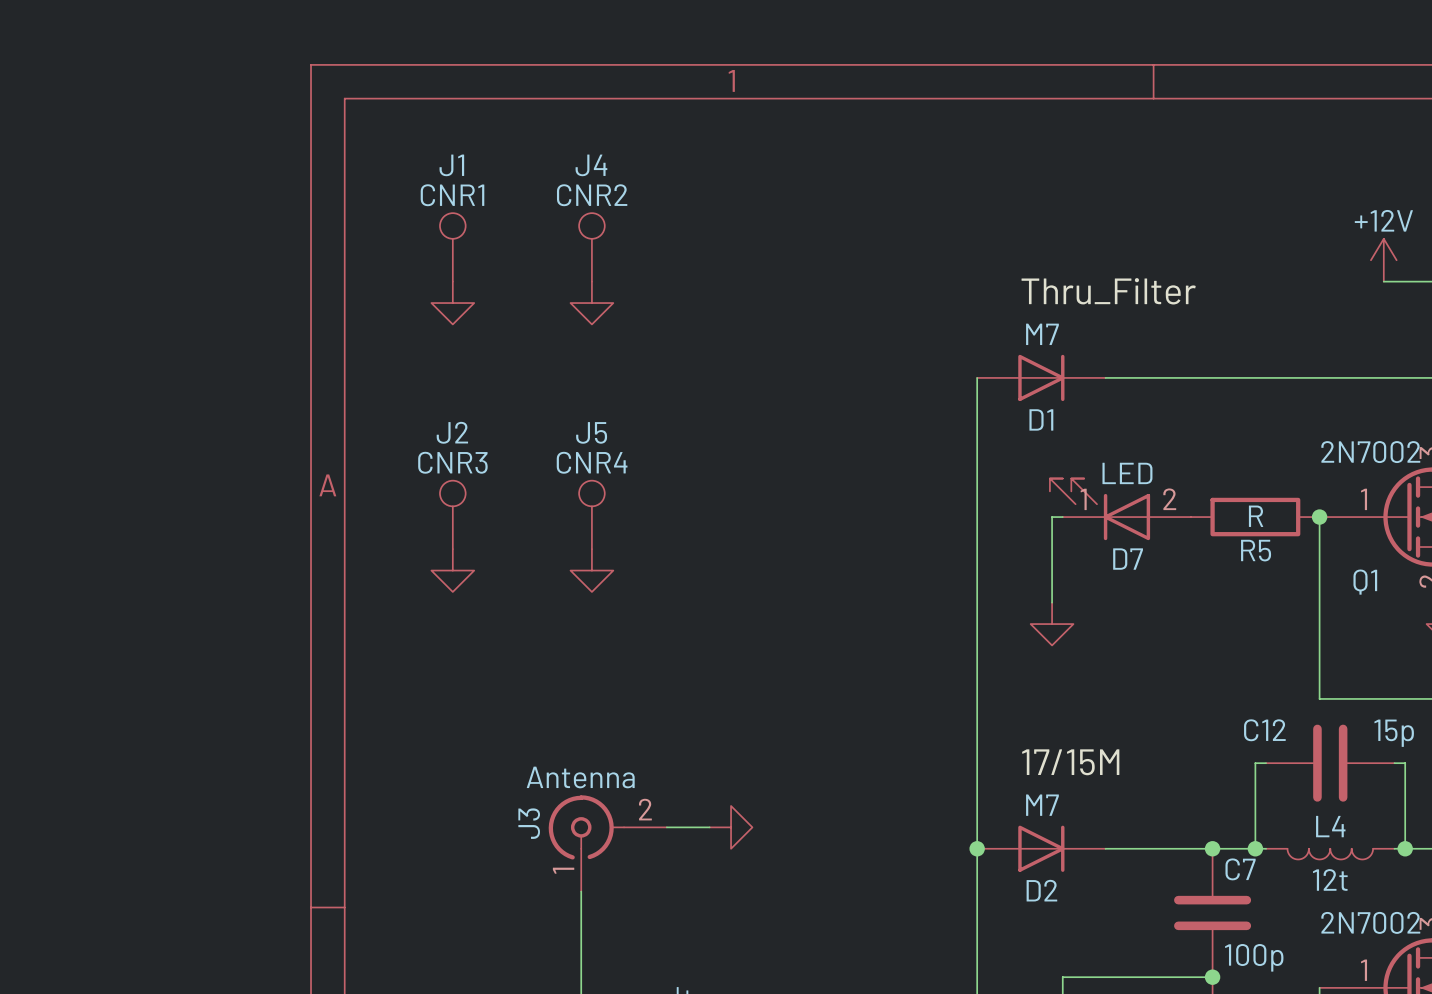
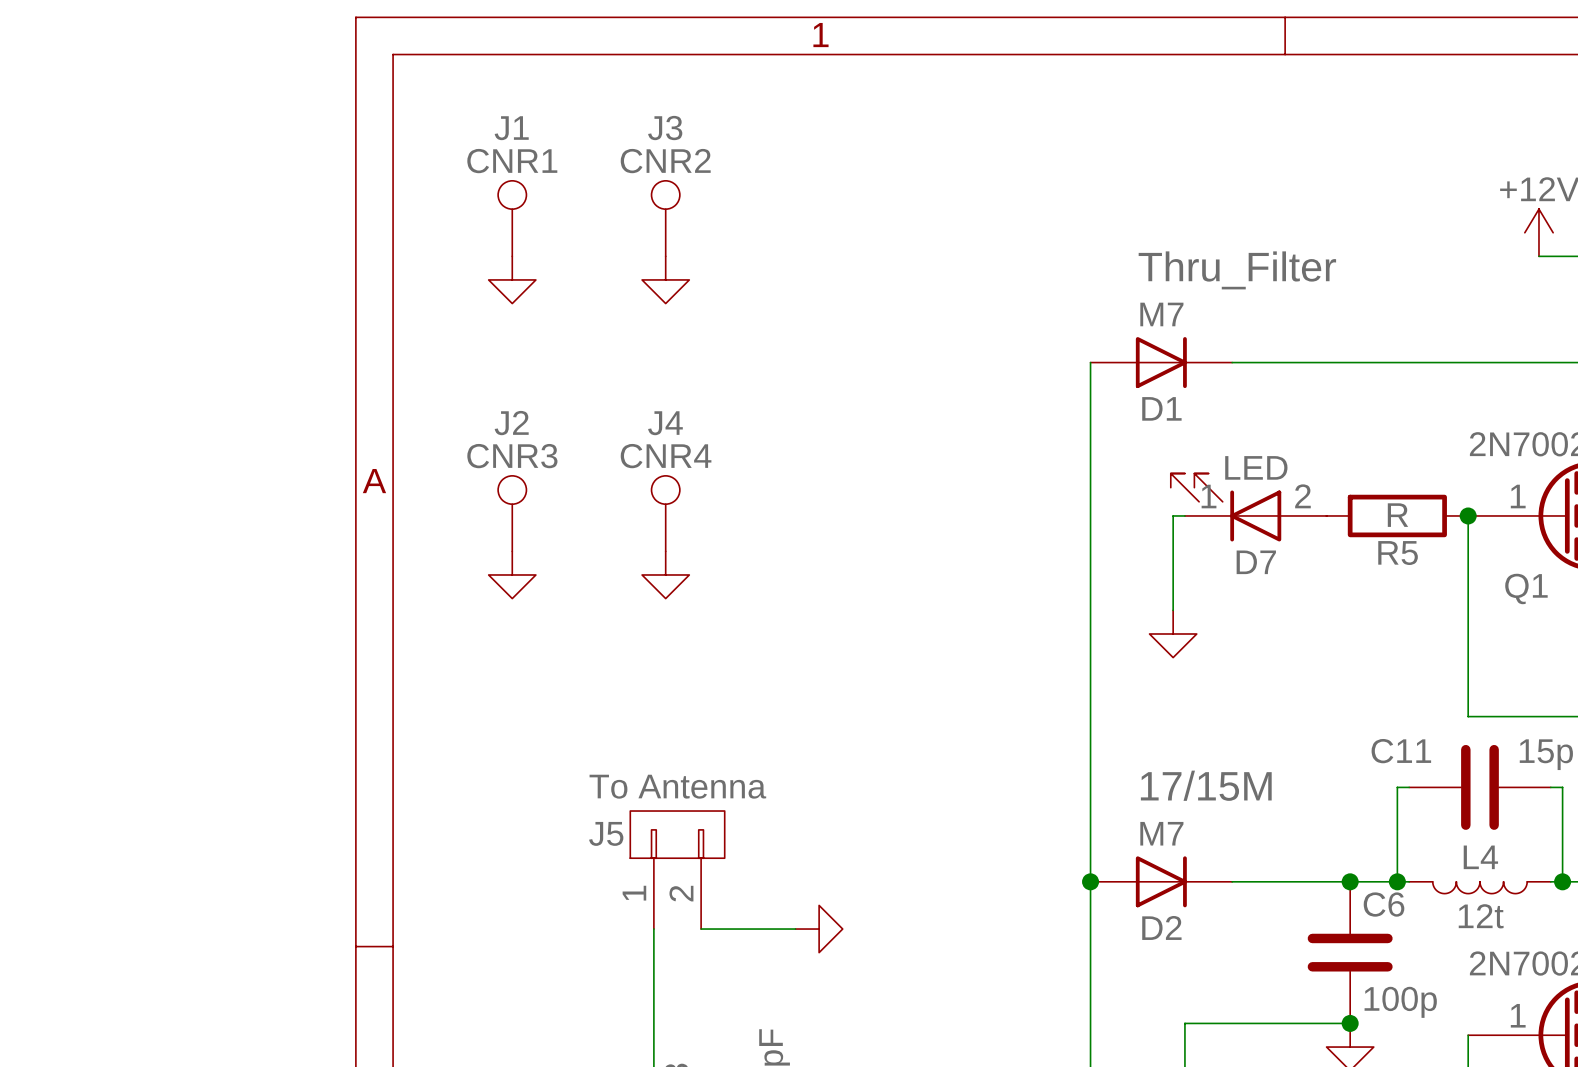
J4 name: J4 (591, 165) -> J3 (665, 128)
J5 name: J5 (591, 432) -> J4 (665, 423)
C12 name: C12 (1264, 730) -> C11 (1401, 751)
wire: (666, 827) (709, 827) -> none
power symbol position: (731, 827) -> (819, 929)
J5: none -> To Antenna (677, 870)
J3: Antenna (607, 843) -> none
C7 name: C7 (1240, 869) -> C6 (1384, 904)
wire: none -> (701, 929) (795, 929)

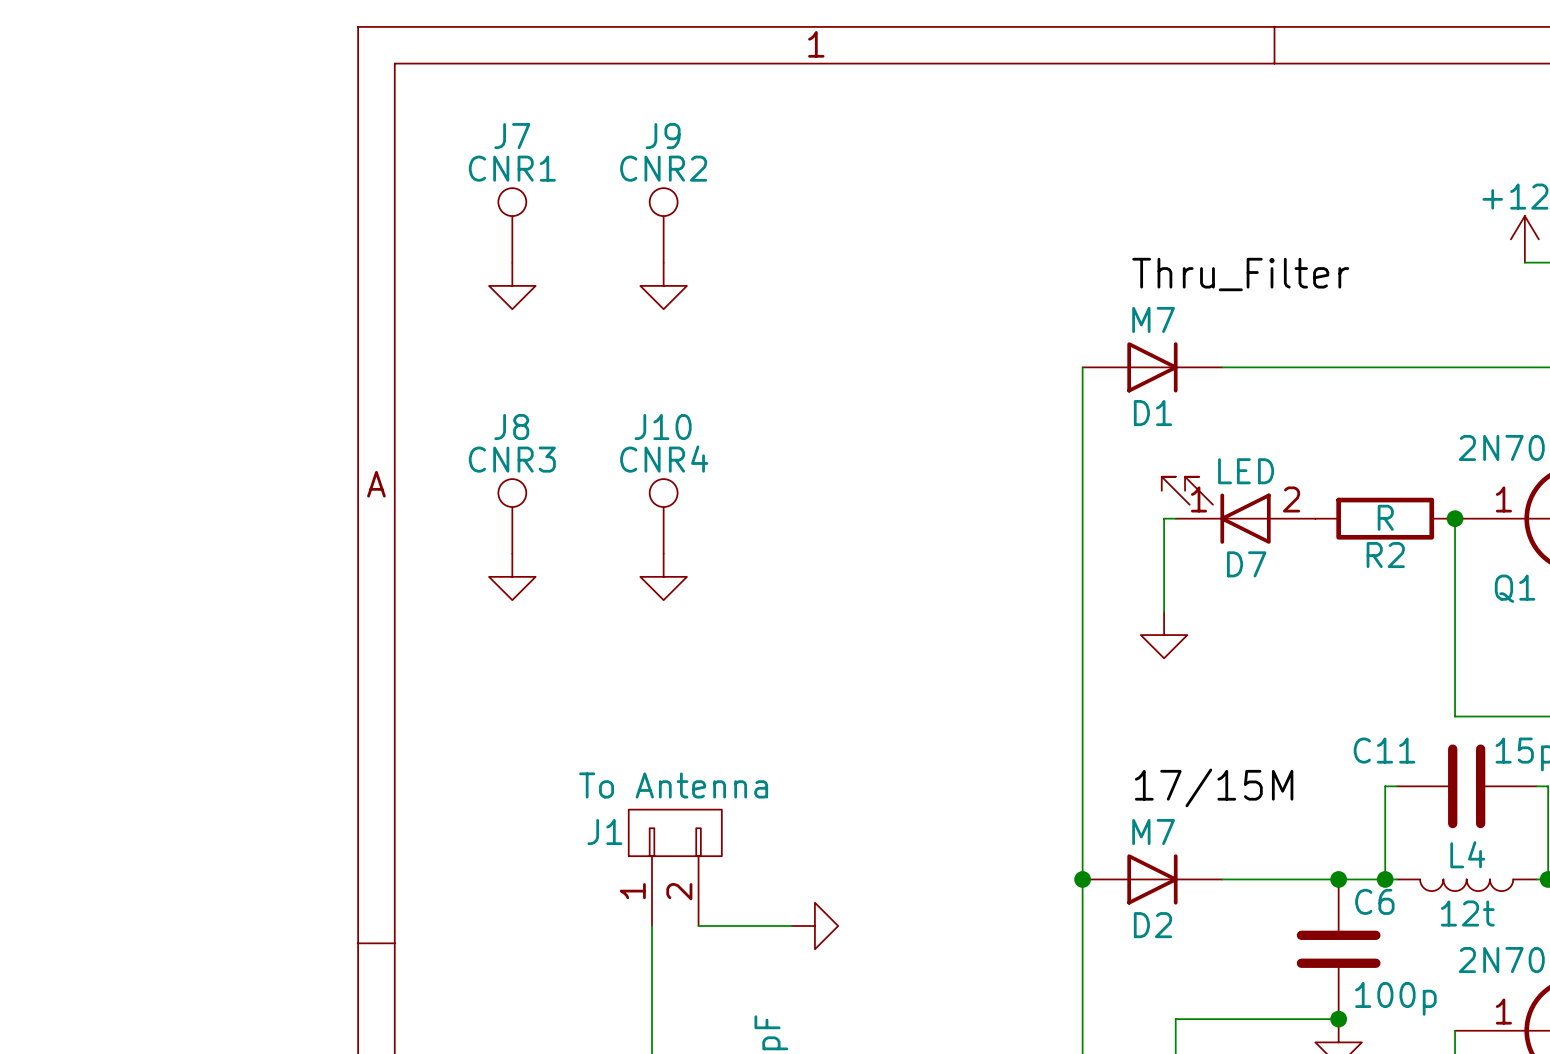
J1 name: J1 (511, 128) -> J7 (512, 136)
J3 name: J3 (665, 128) -> J9 (663, 136)
J2 name: J2 (511, 423) -> J8 (511, 427)
J4 name: J4 (665, 423) -> J10 (663, 427)
R5 name: R5 (1398, 553) -> R2 (1385, 555)
J5 name: J5 (606, 833) -> J1 (604, 832)

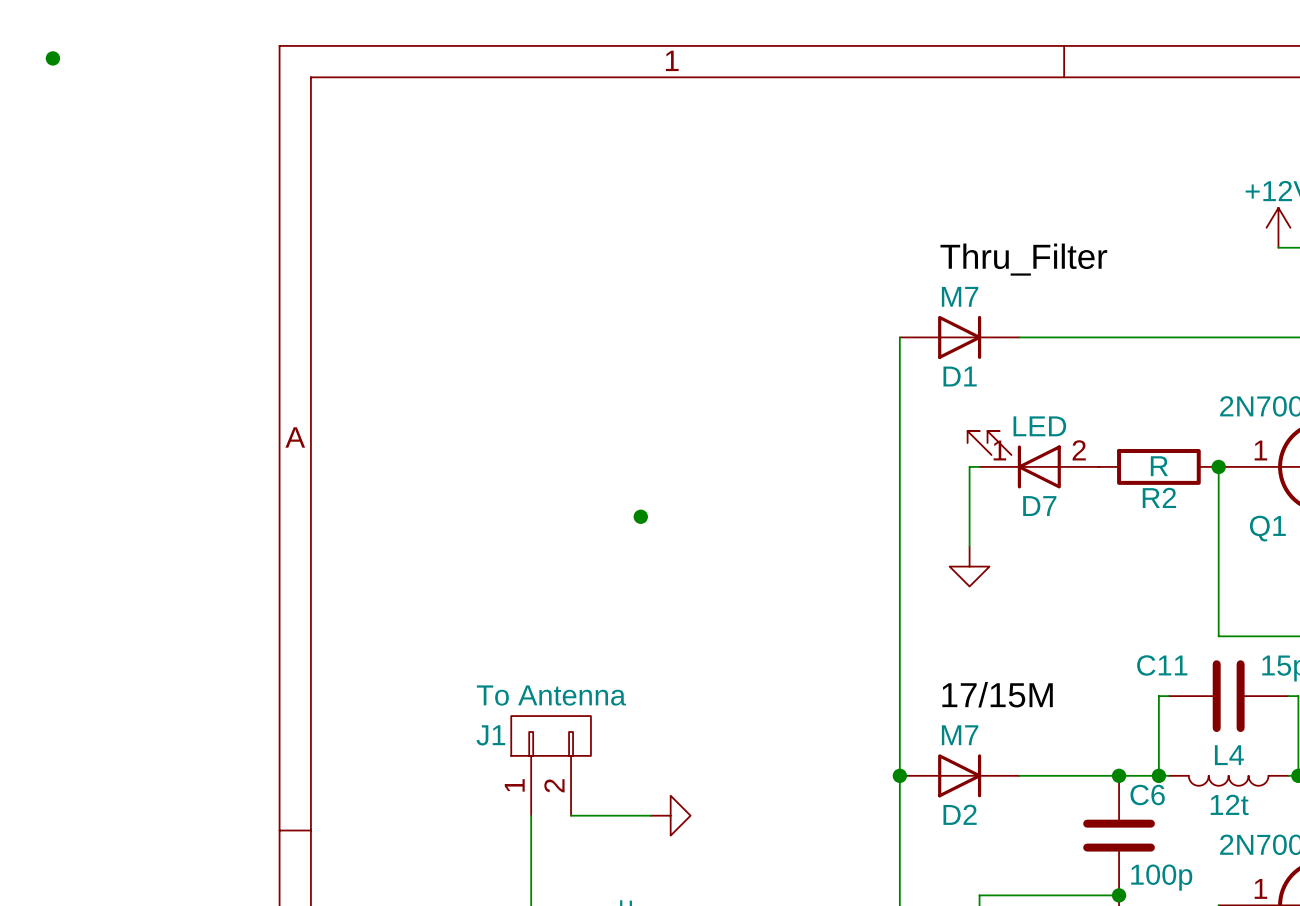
junction: none -> (52, 58)
J7: CNR1 (512, 225) -> none
J9: CNR2 (663, 225) -> none
power symbol: (512, 285) -> none
power symbol: (663, 285) -> none
J8: CNR3 (512, 516) -> none
J10: CNR4 (663, 516) -> none
power symbol: (512, 576) -> none
power symbol: (663, 576) -> none
junction: none -> (640, 516)

